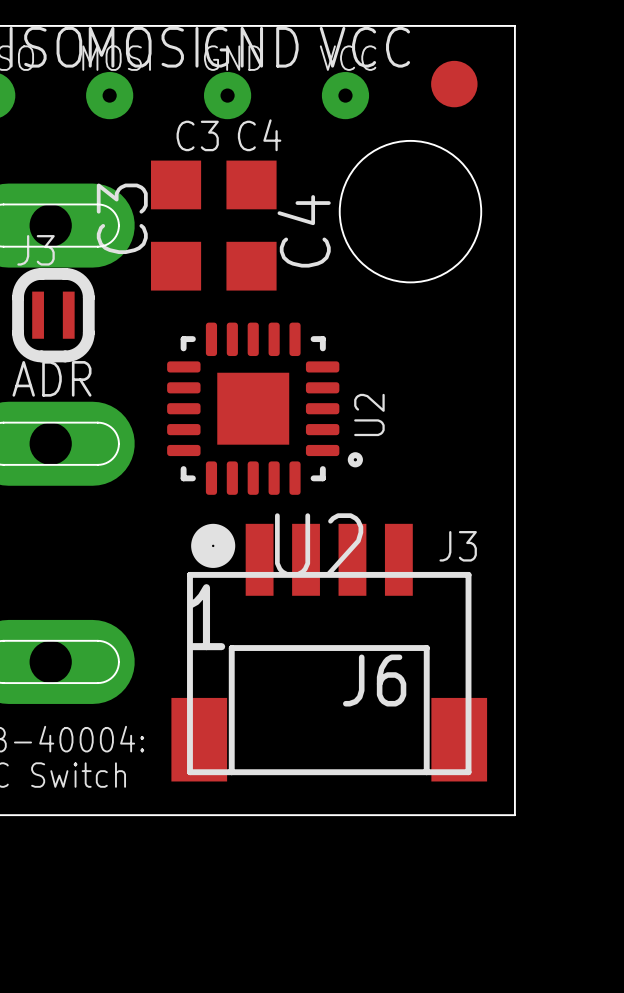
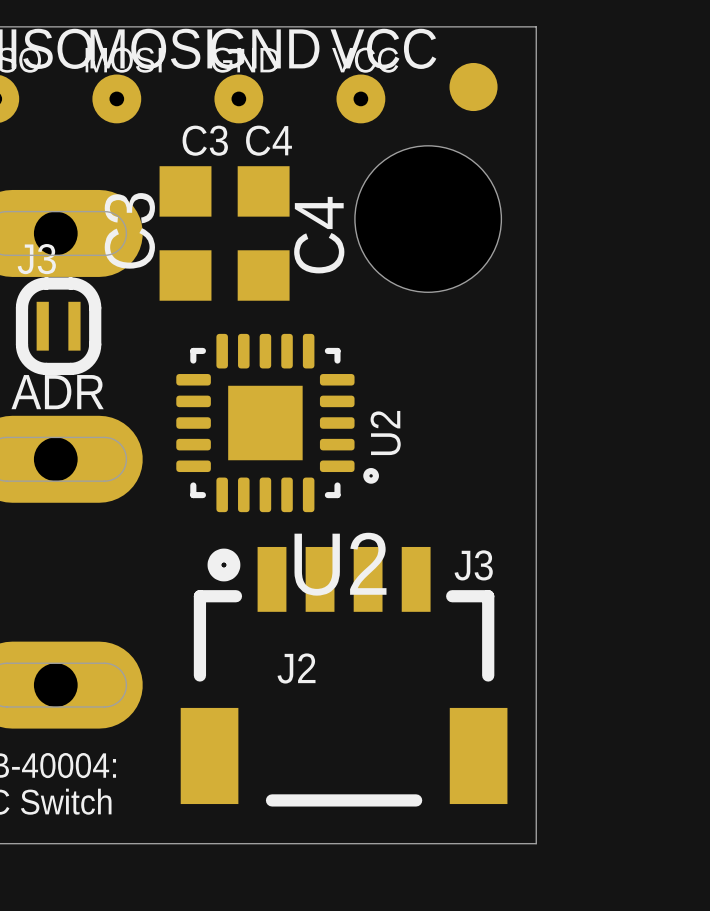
J6: (329, 652) -> none
J2: none -> (344, 676)

